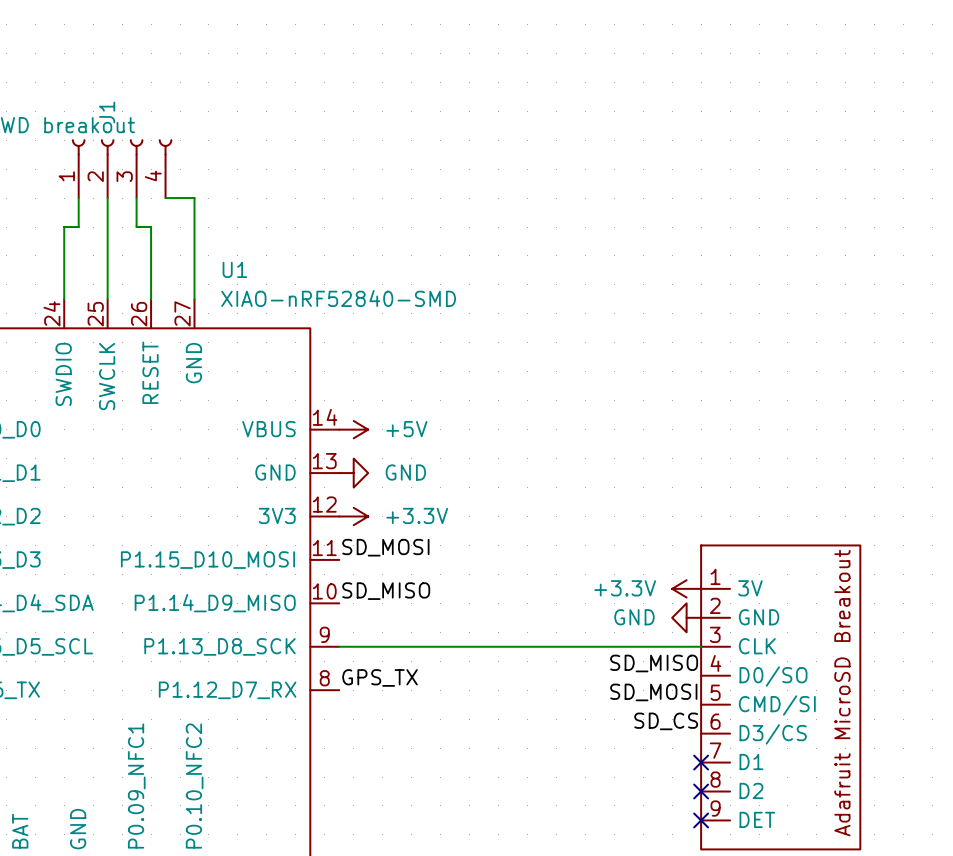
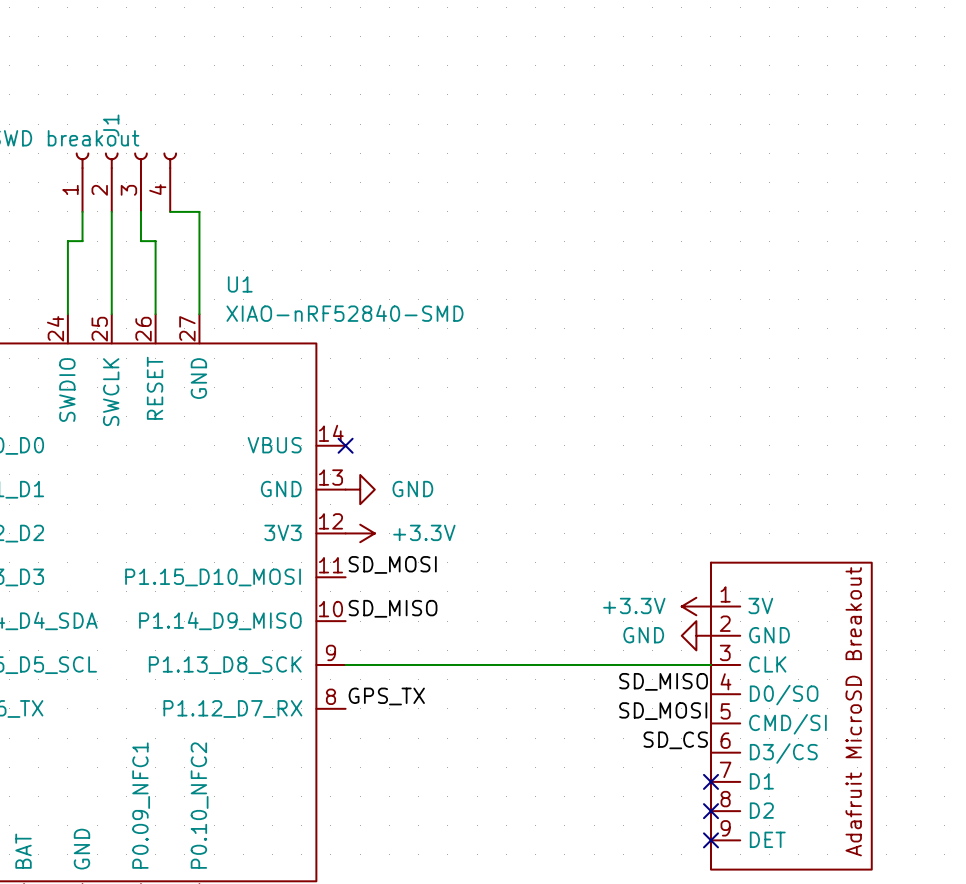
no-connect mark: none -> (345, 445)
power symbol: +5V (353, 429) -> none

